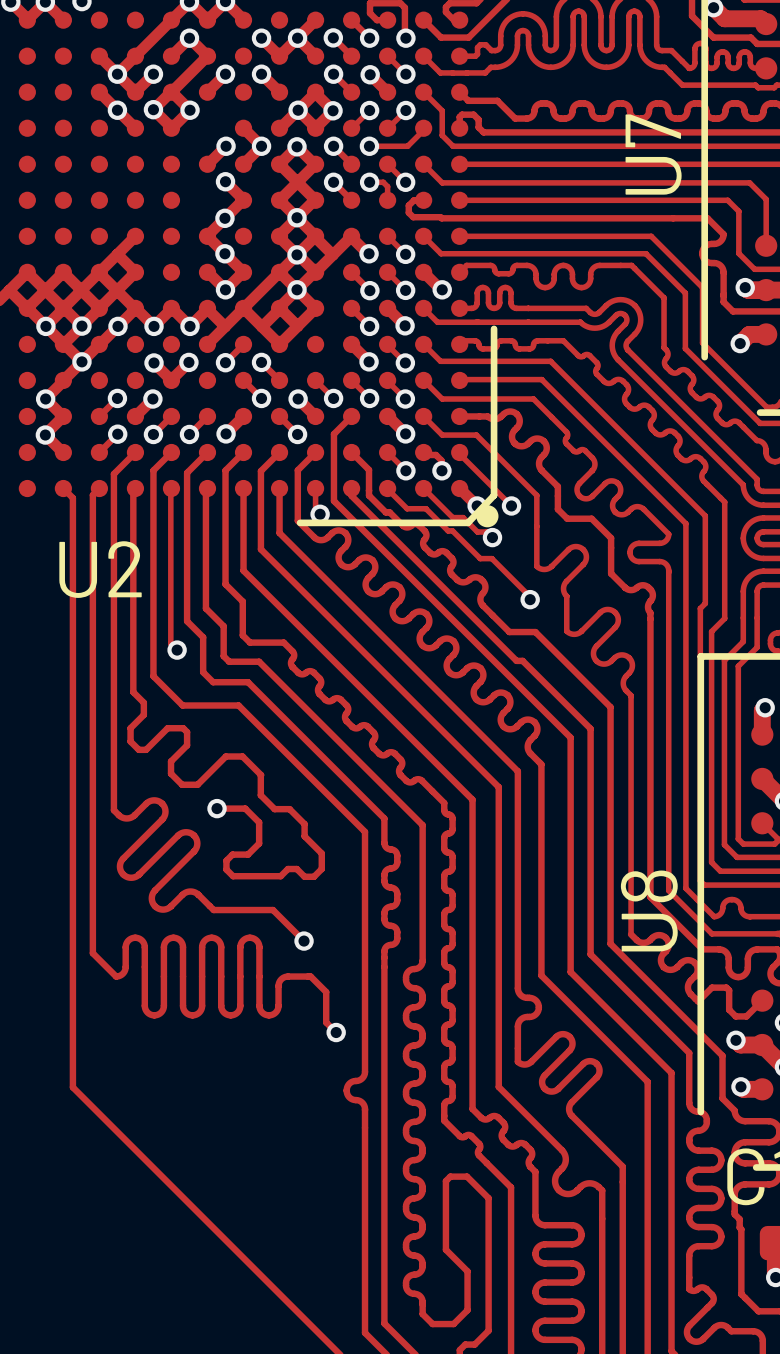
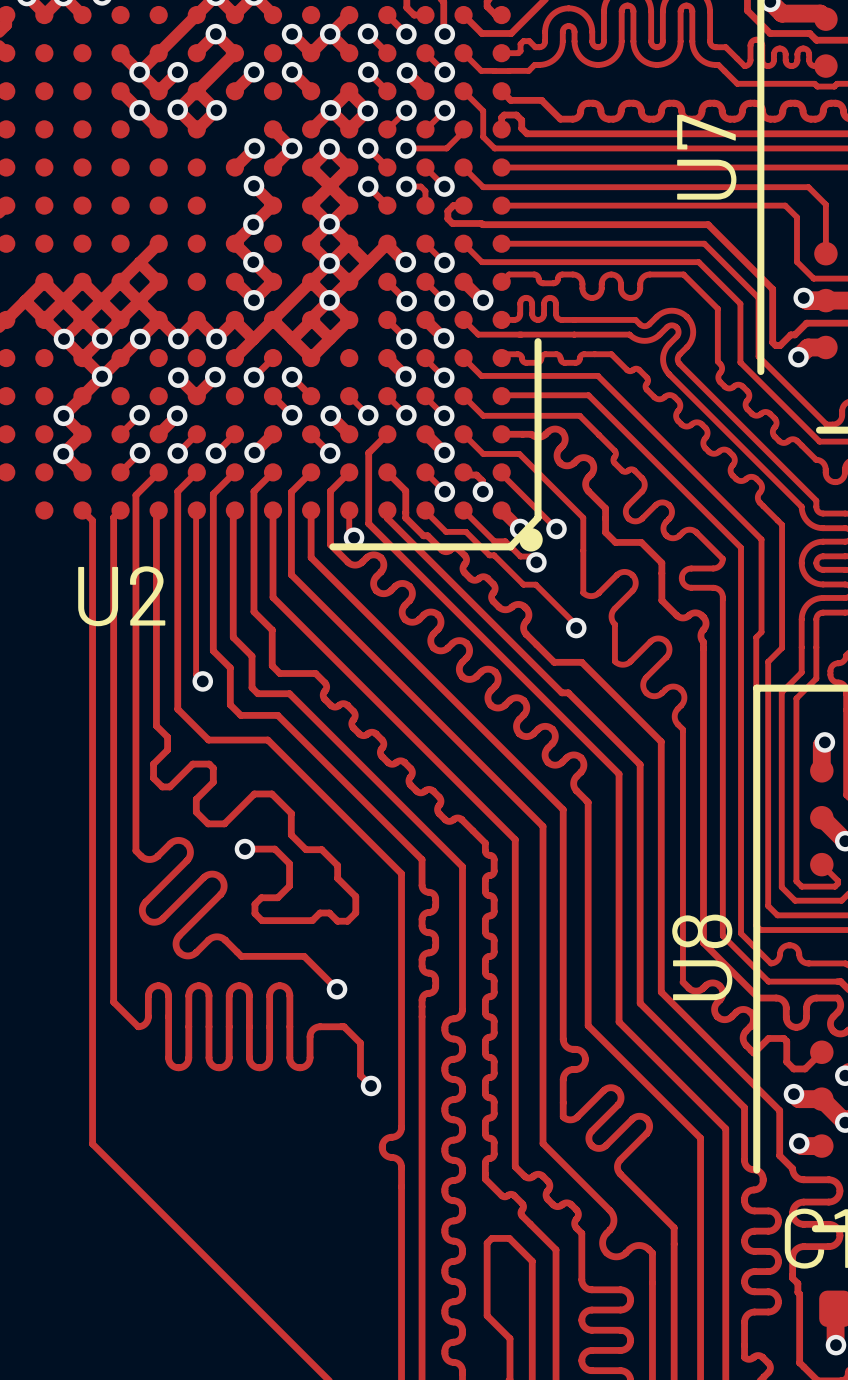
track: (654, 218) (707, 218) (723, 234) (718, 242) (705, 246) (702, 255) (707, 261) (717, 263) (722, 268) (723, 302) (733, 311) (748, 311) -> (708, 224) (772, 289) (772, 342) (775, 345) (780, 345) (806, 323)

